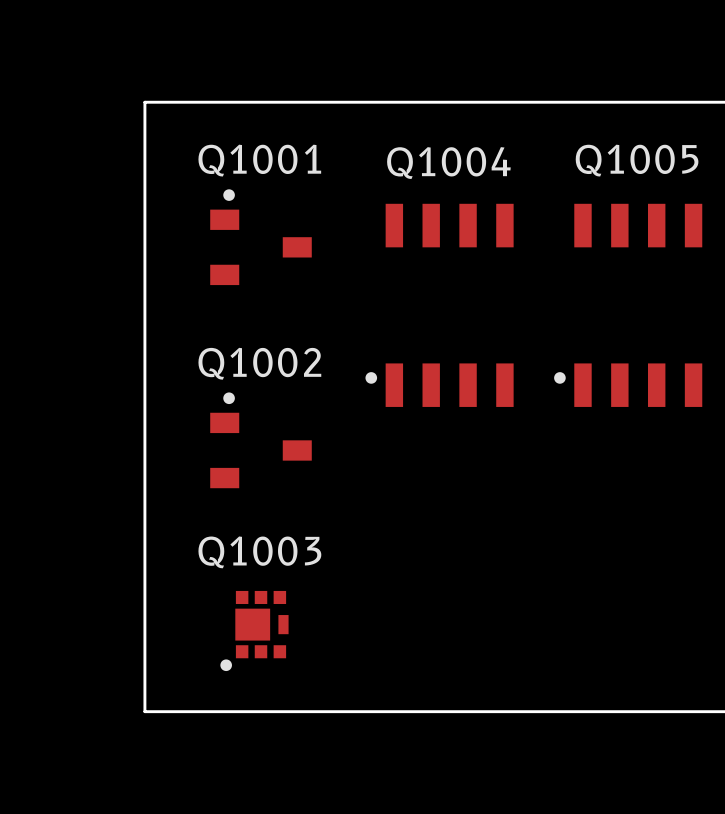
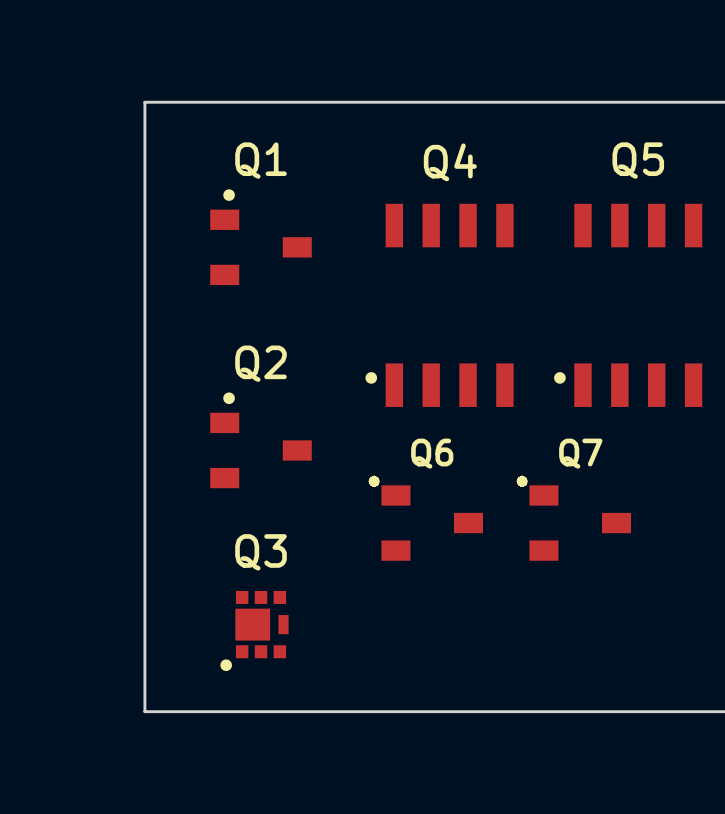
Q1001 name: Q1001 (259, 160) -> Q1 (261, 160)
Q1005 name: Q1005 (637, 160) -> Q5 (638, 160)
Q1004 name: Q1004 (448, 163) -> Q4 (450, 162)
Q1002 name: Q1002 (259, 363) -> Q2 (261, 363)
Q6: none -> (432, 523)
Q7: none -> (580, 523)
Q1003 name: Q1003 (259, 552) -> Q3 (261, 552)

